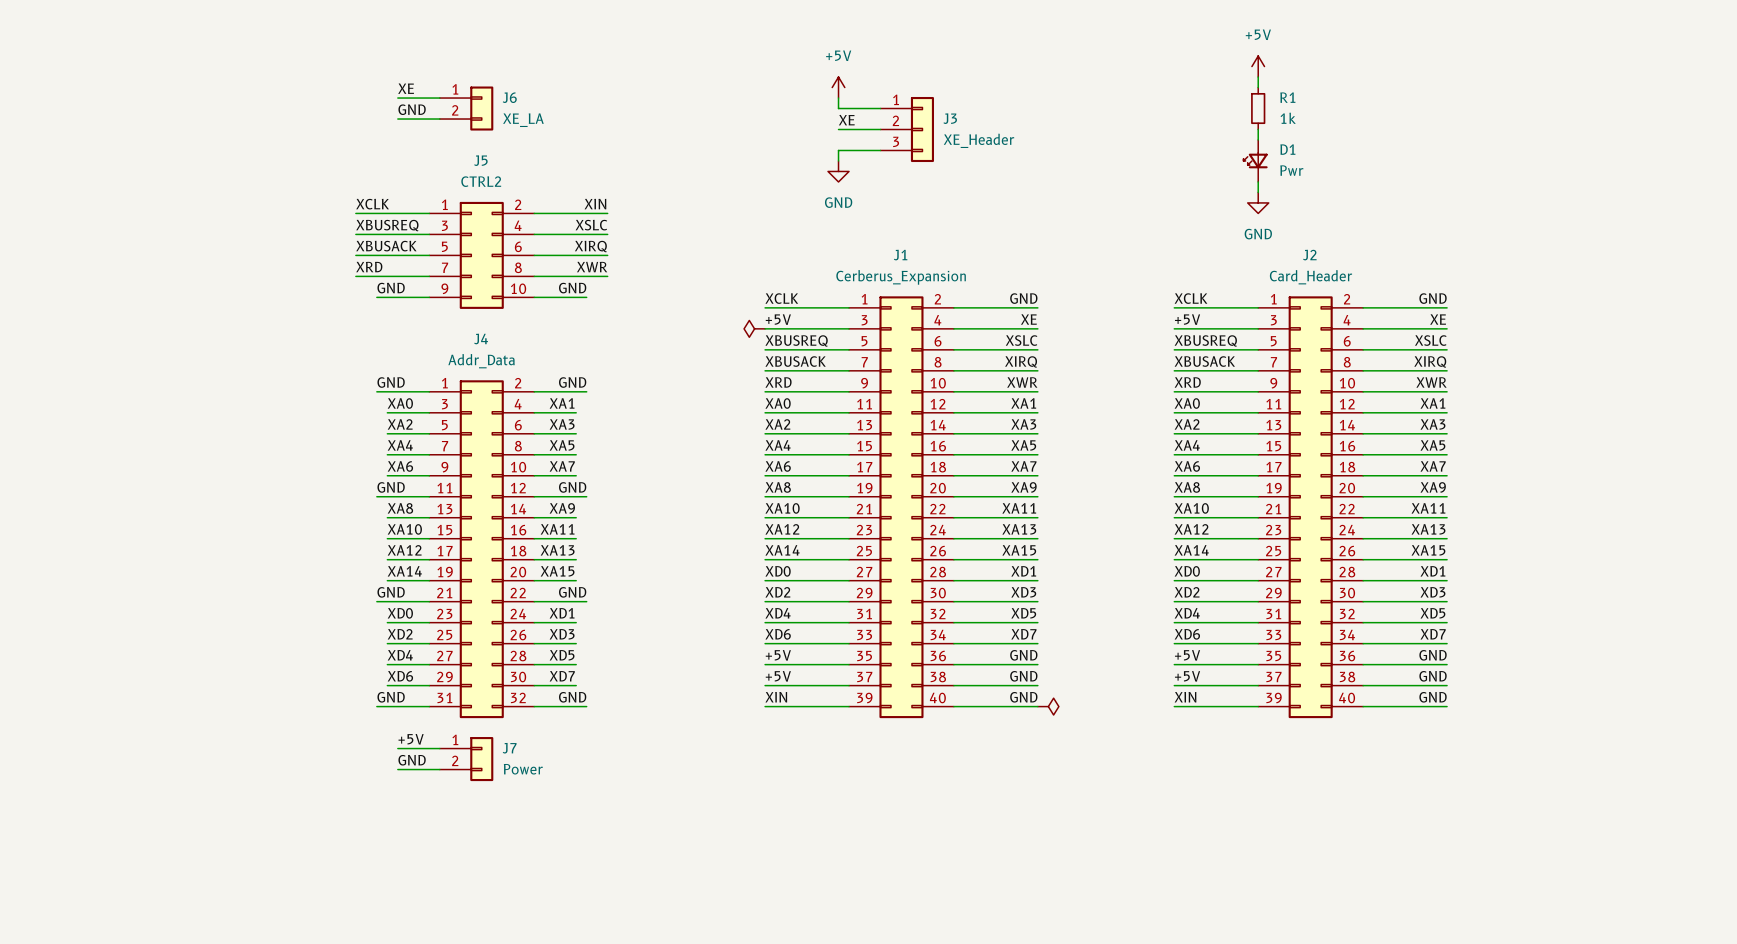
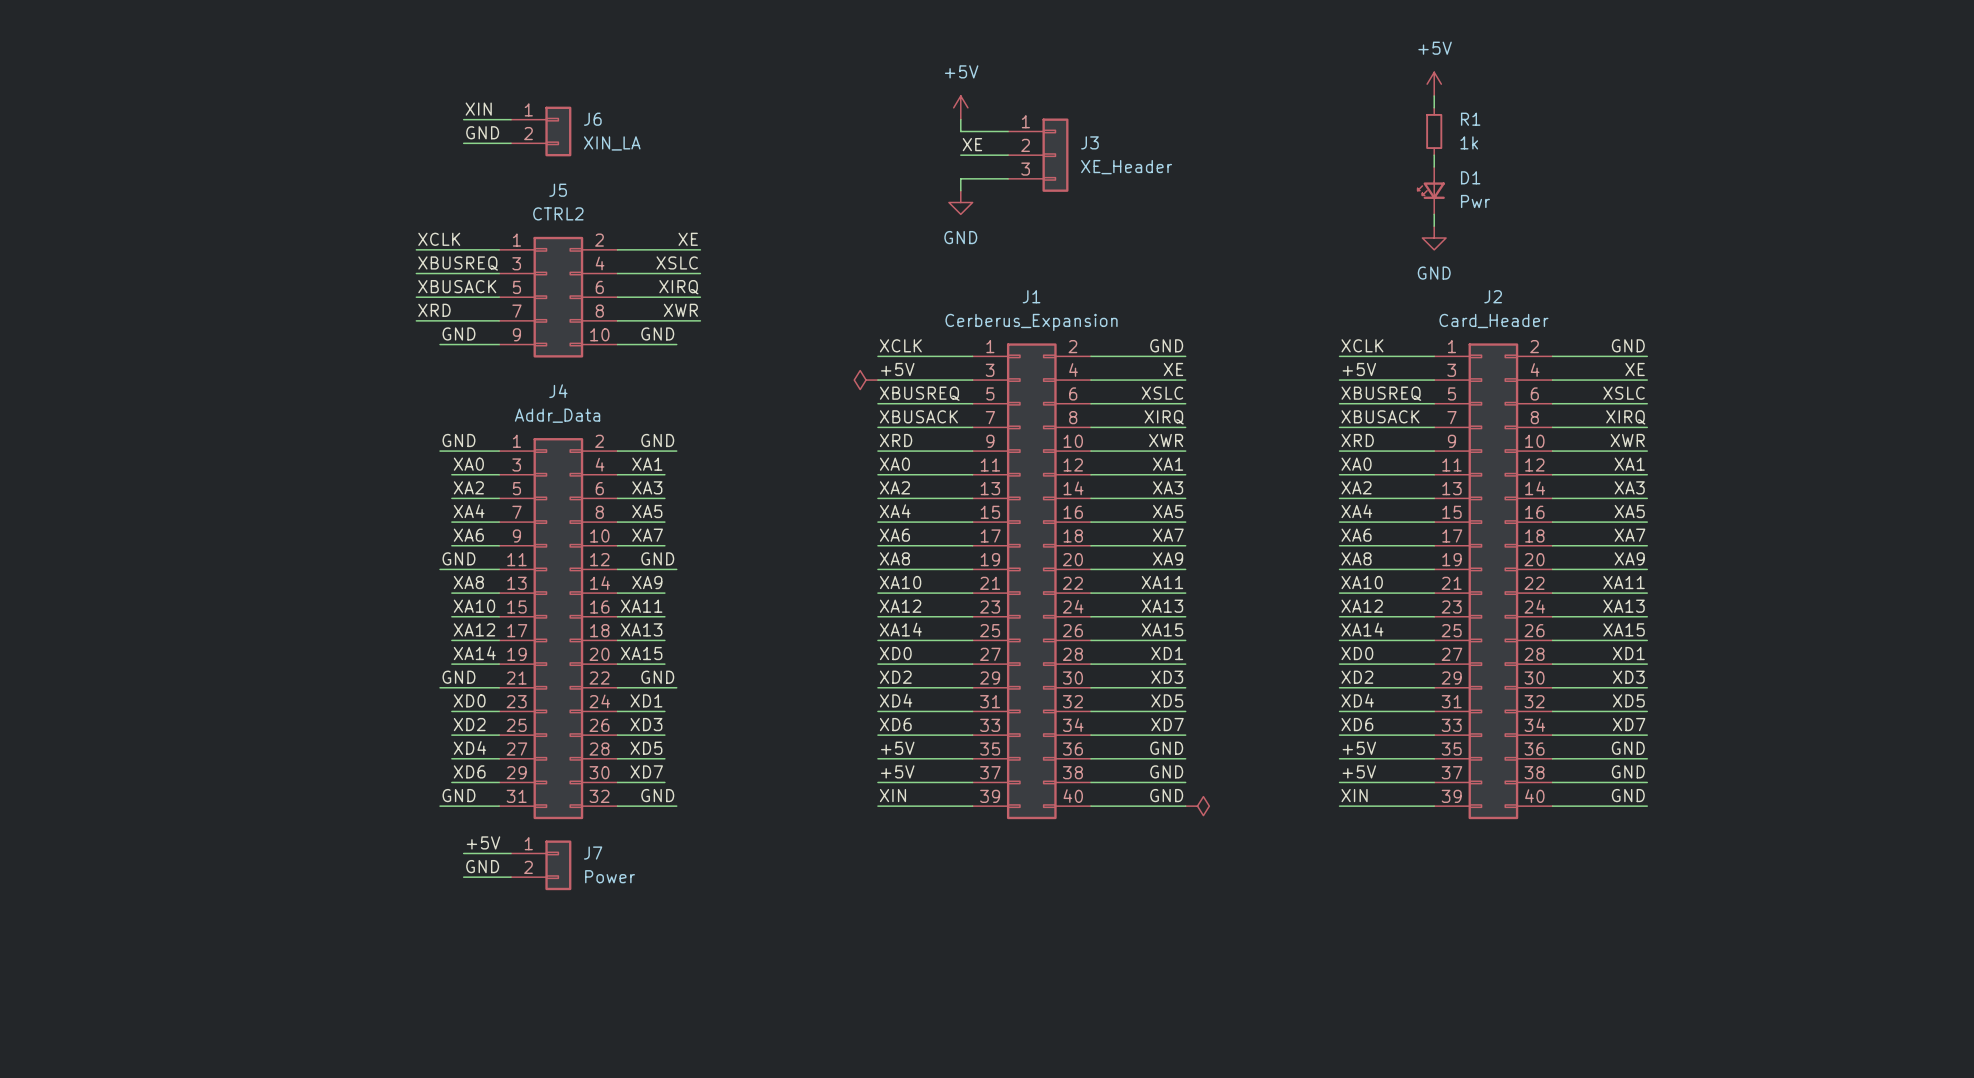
label: XE (406, 88) -> XIN (478, 109)
J6 value: XE_LA (523, 120) -> XIN_LA (612, 143)
label: XIN (595, 204) -> XE (688, 239)

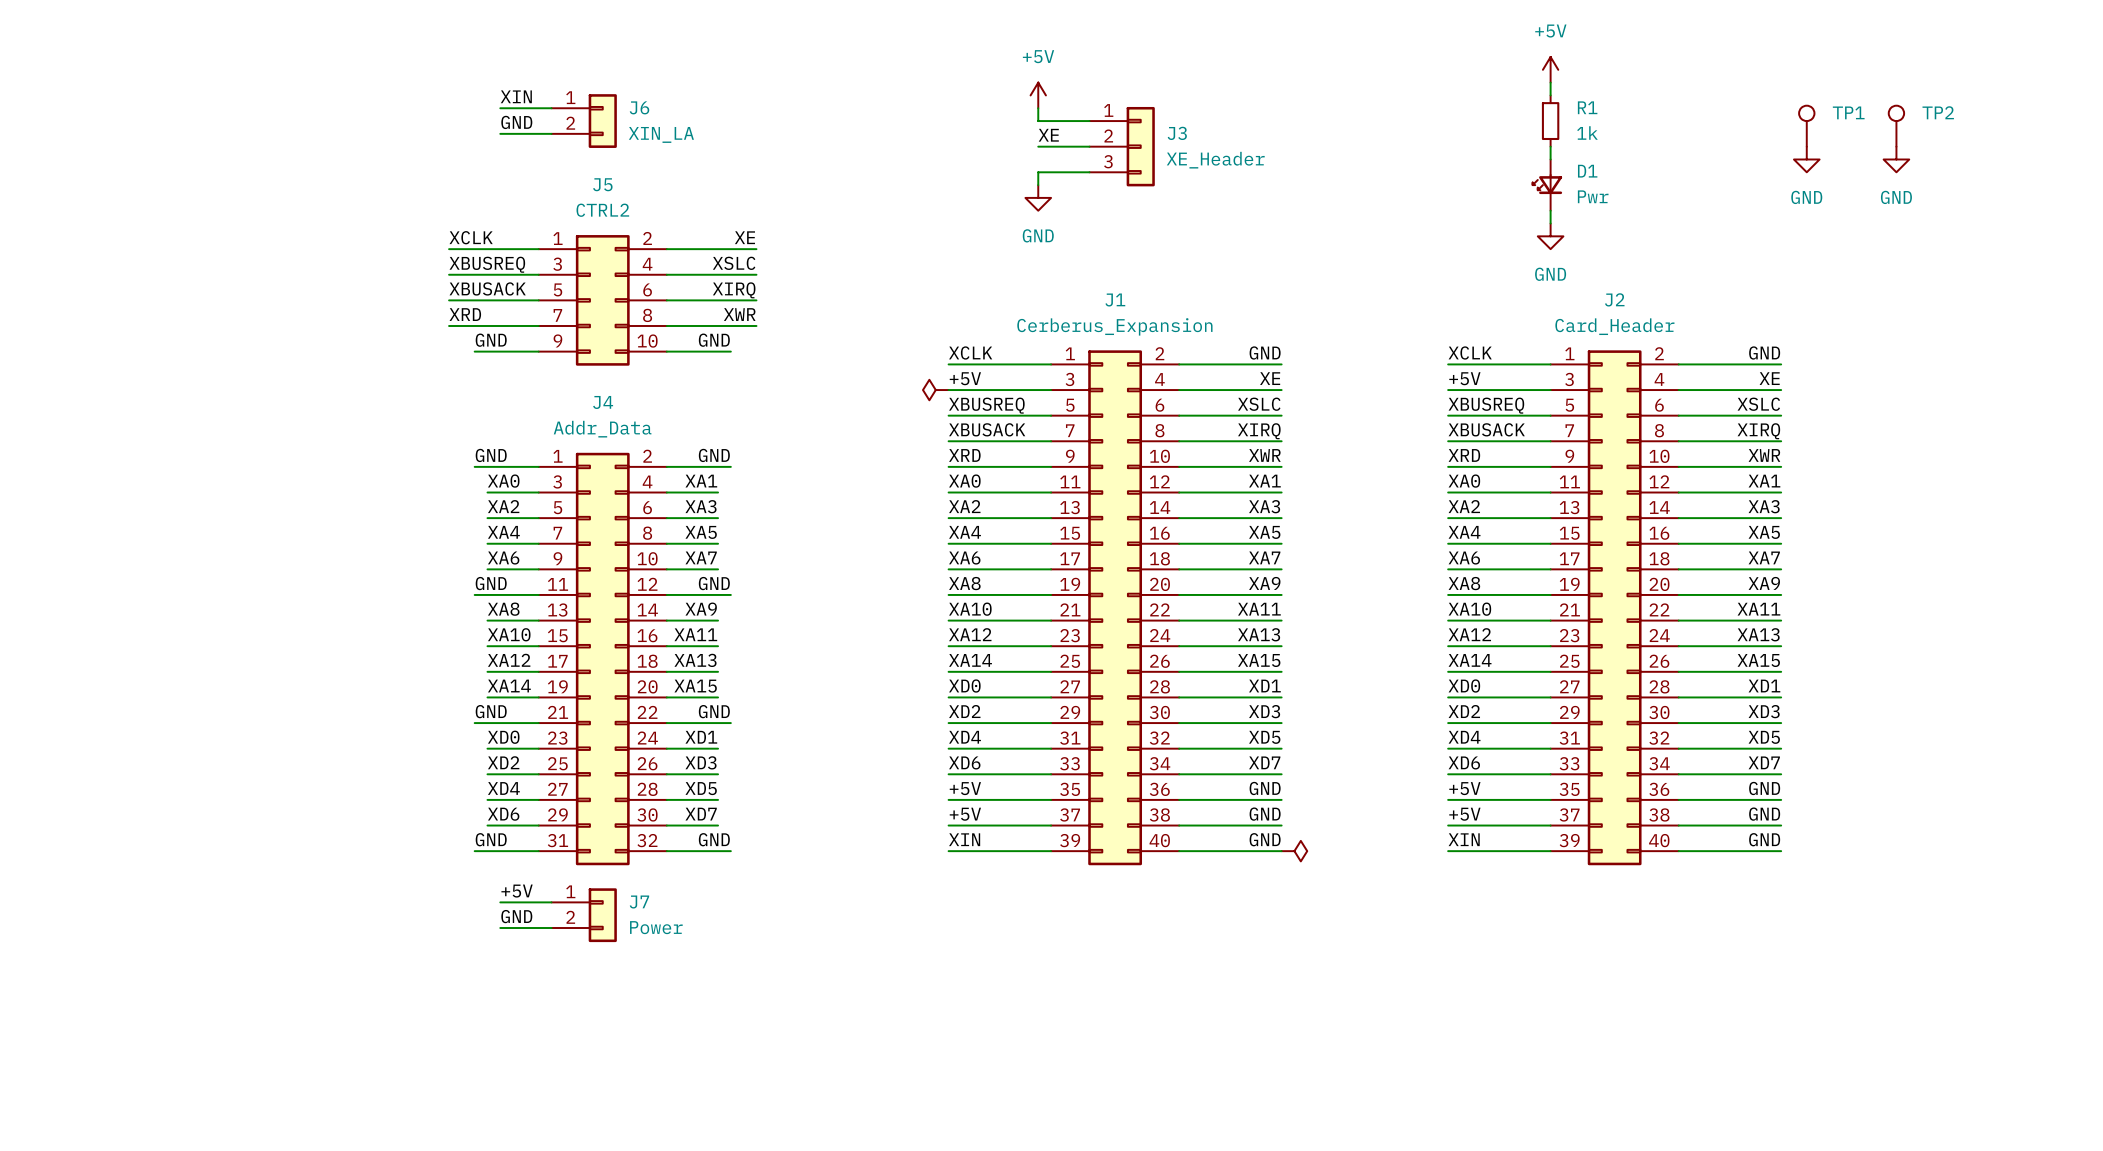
TP1: none -> (1806, 126)
TP2: none -> (1896, 126)
power symbol: none -> GND (1806, 159)
power symbol: none -> GND (1896, 159)

